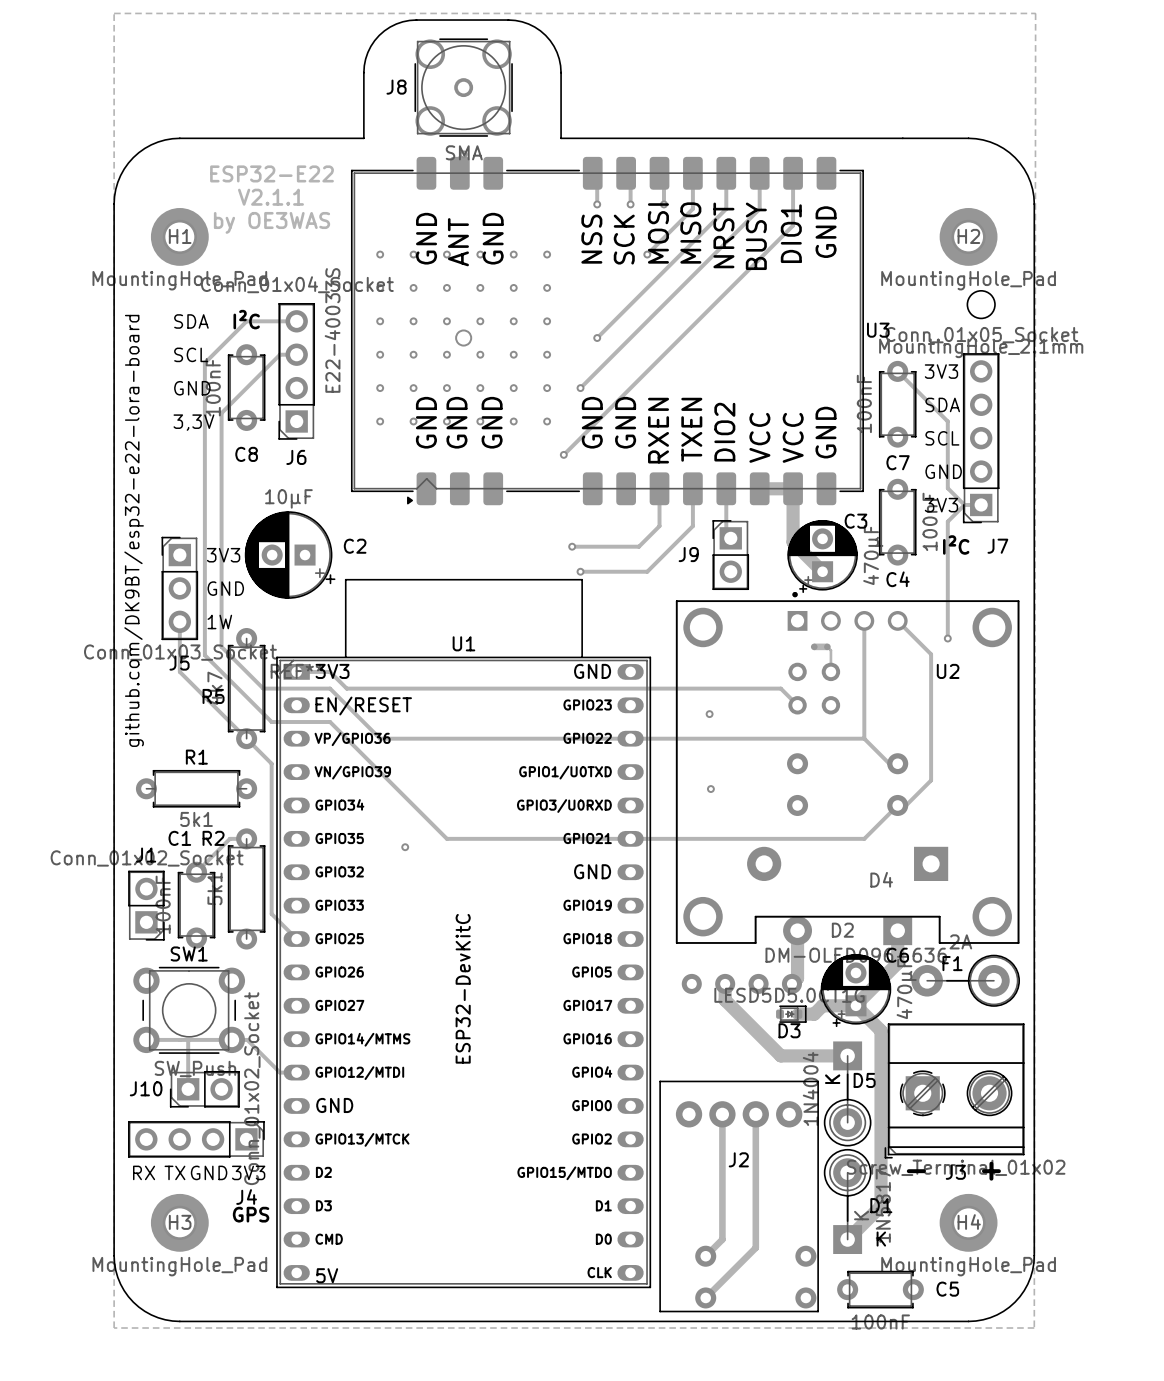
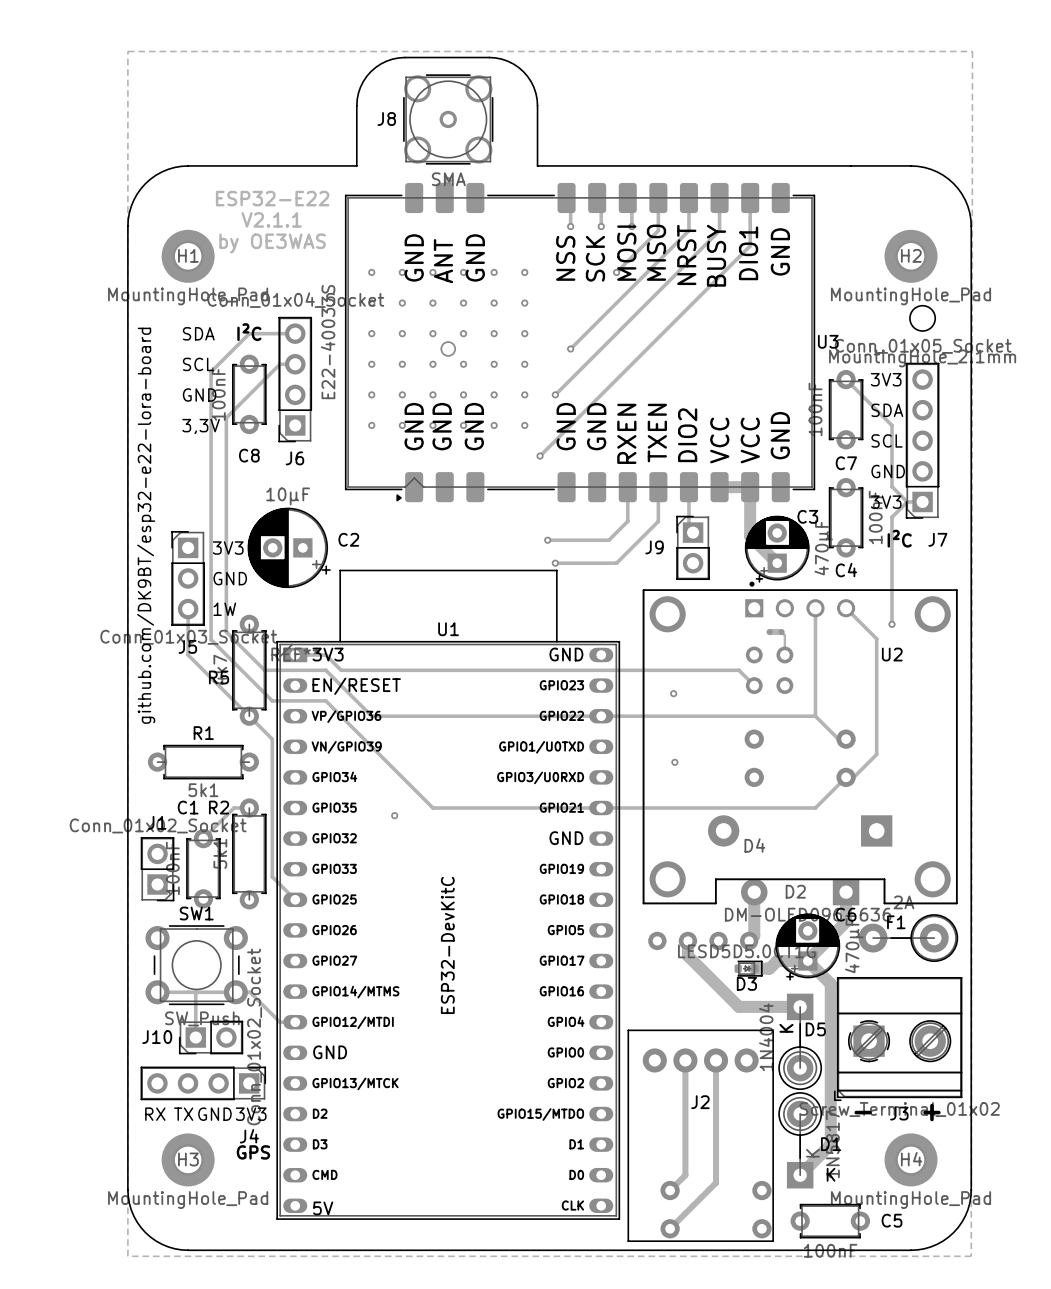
D4 name position: D4 (881, 879) -> D4 (754, 845)

